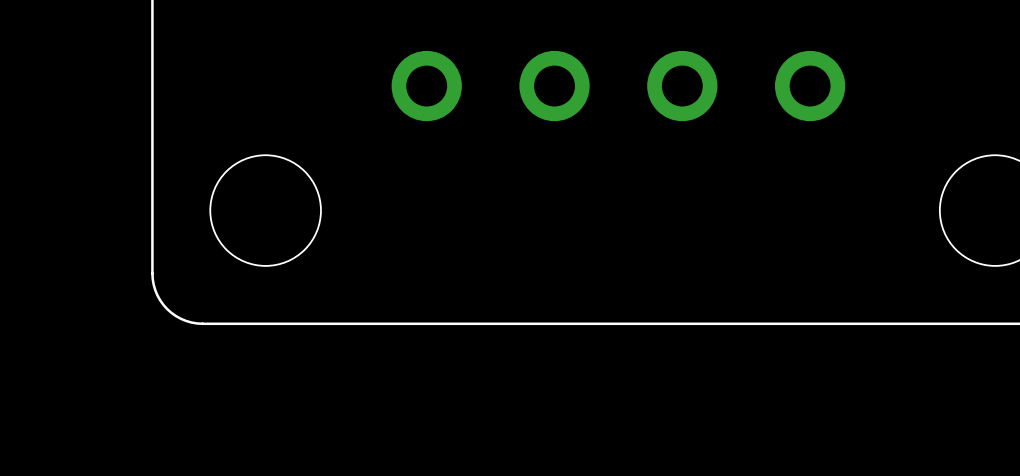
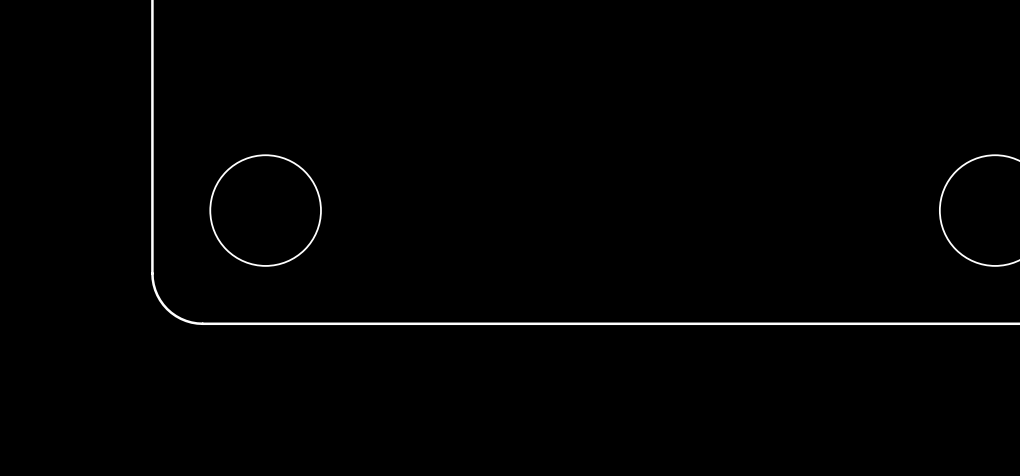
part: (618, 86) -> none

